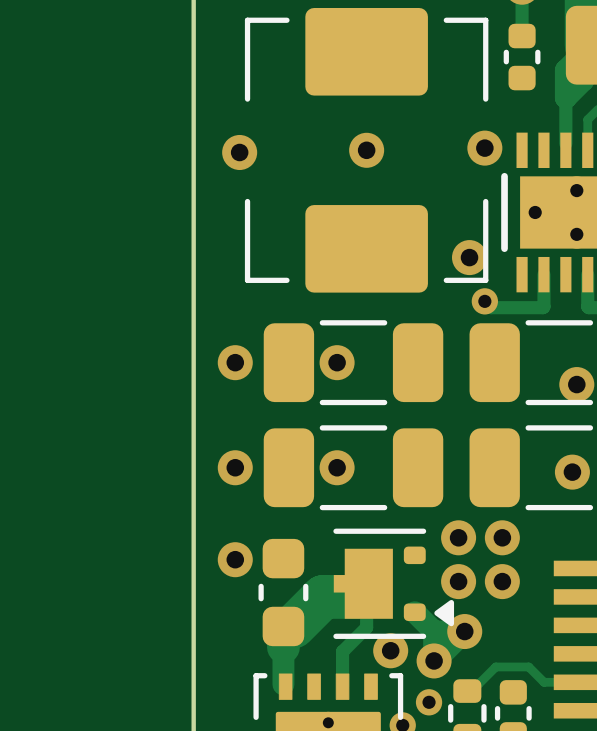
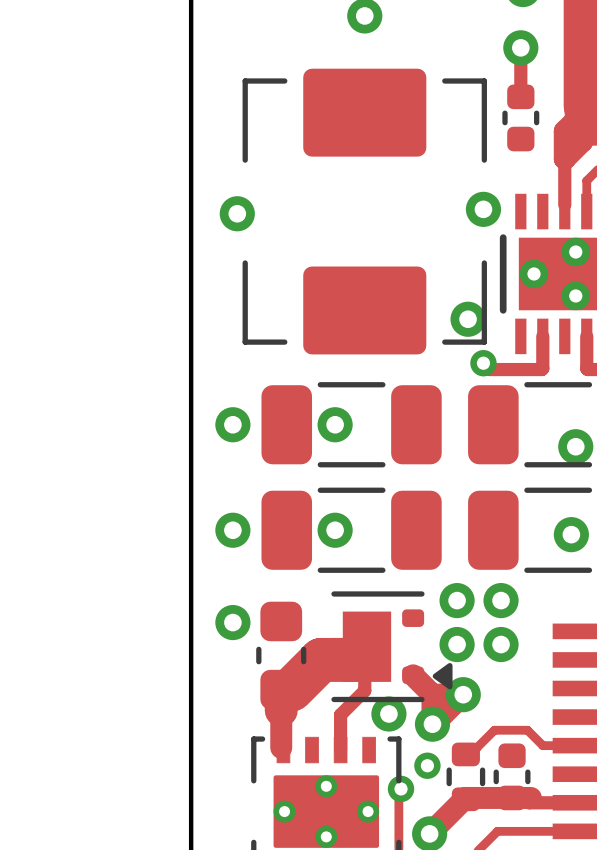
via: (366, 150) -> none

